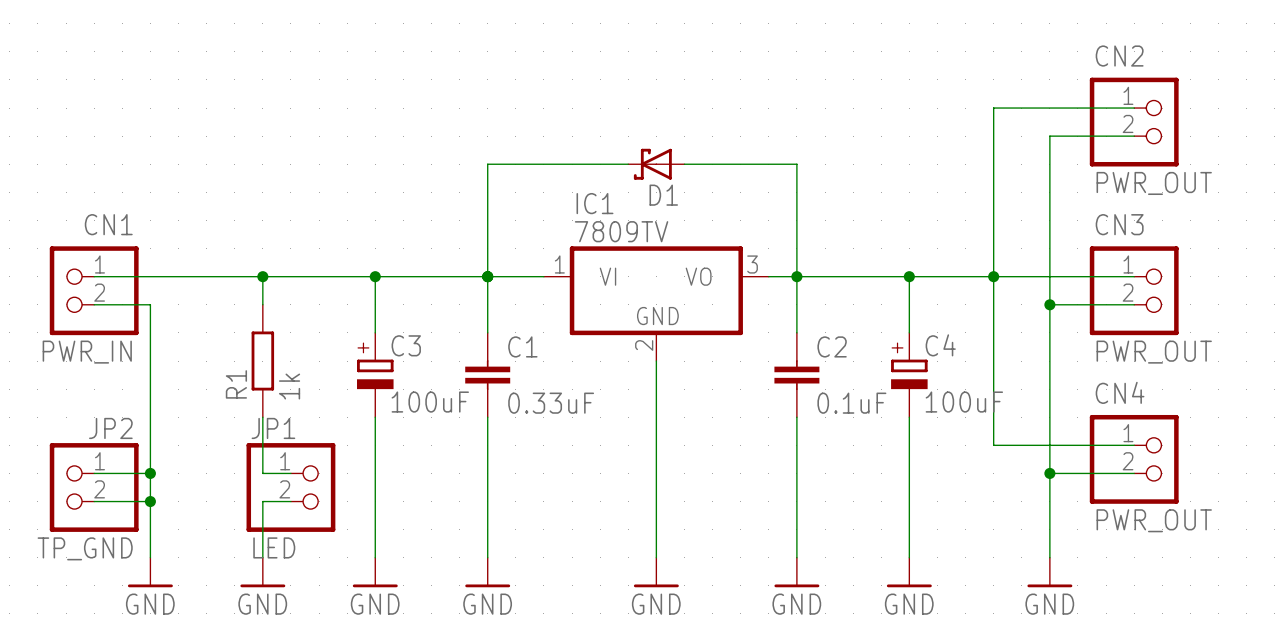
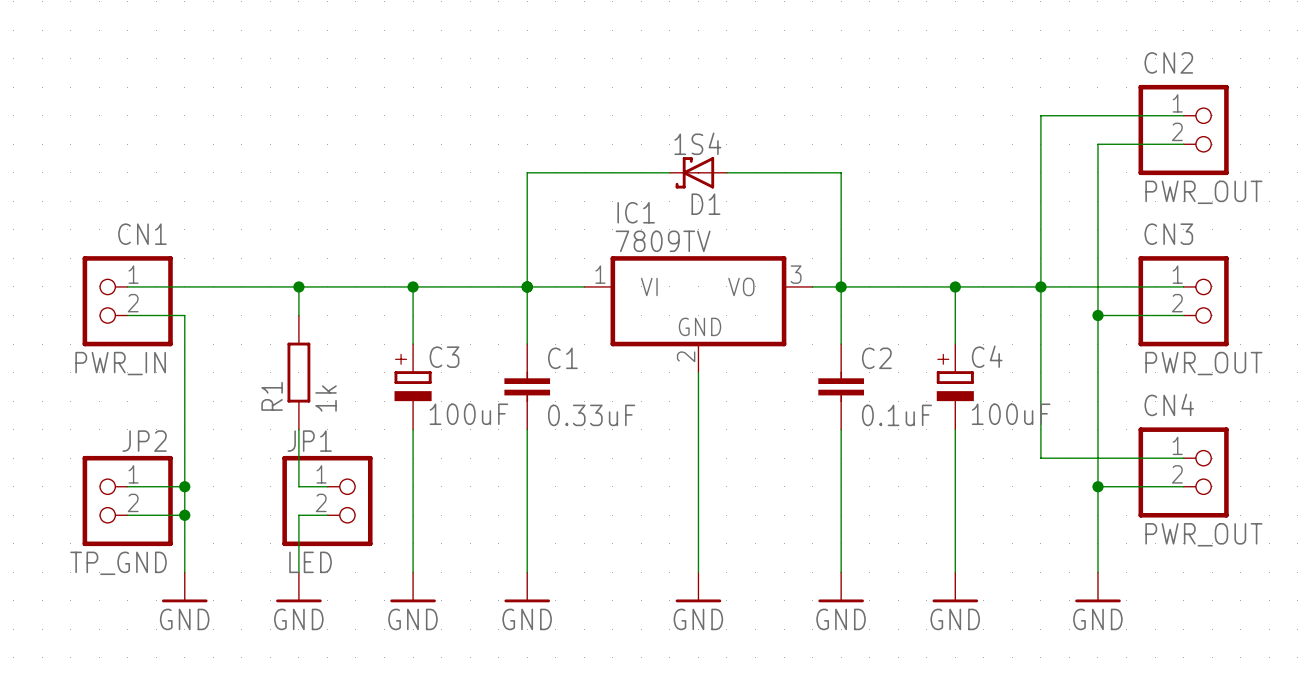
D1 value: none -> 1S4 (697, 143)

